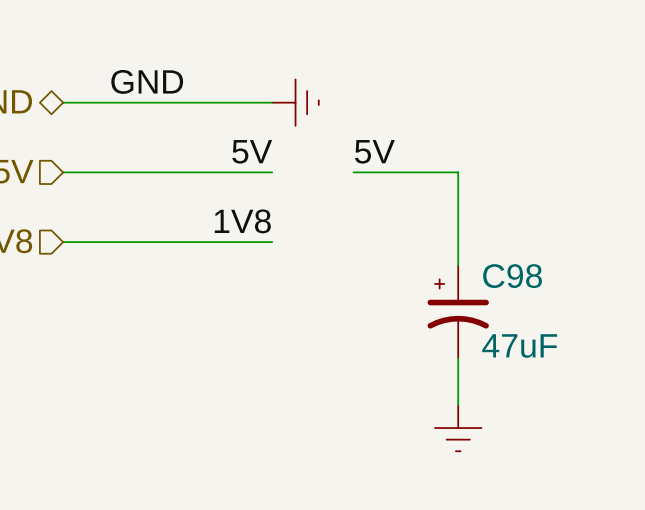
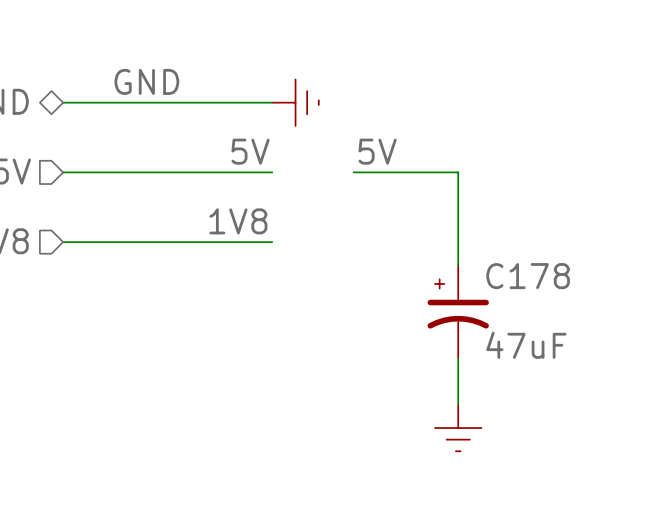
C98 name: C98 (512, 276) -> C178 (528, 276)

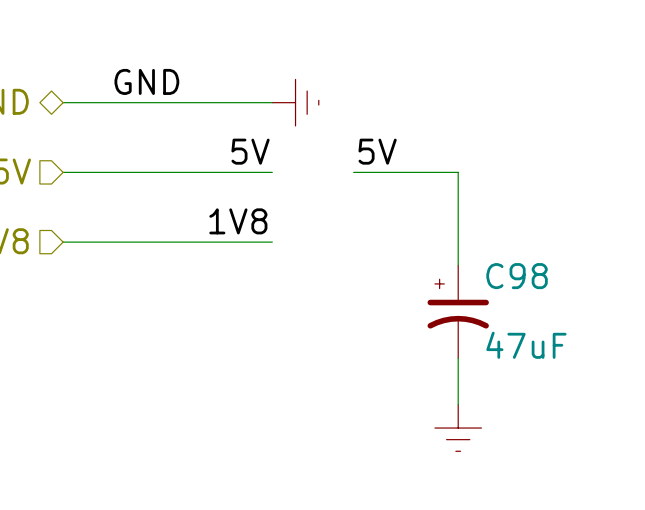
C178 name: C178 (528, 276) -> C98 (517, 276)

